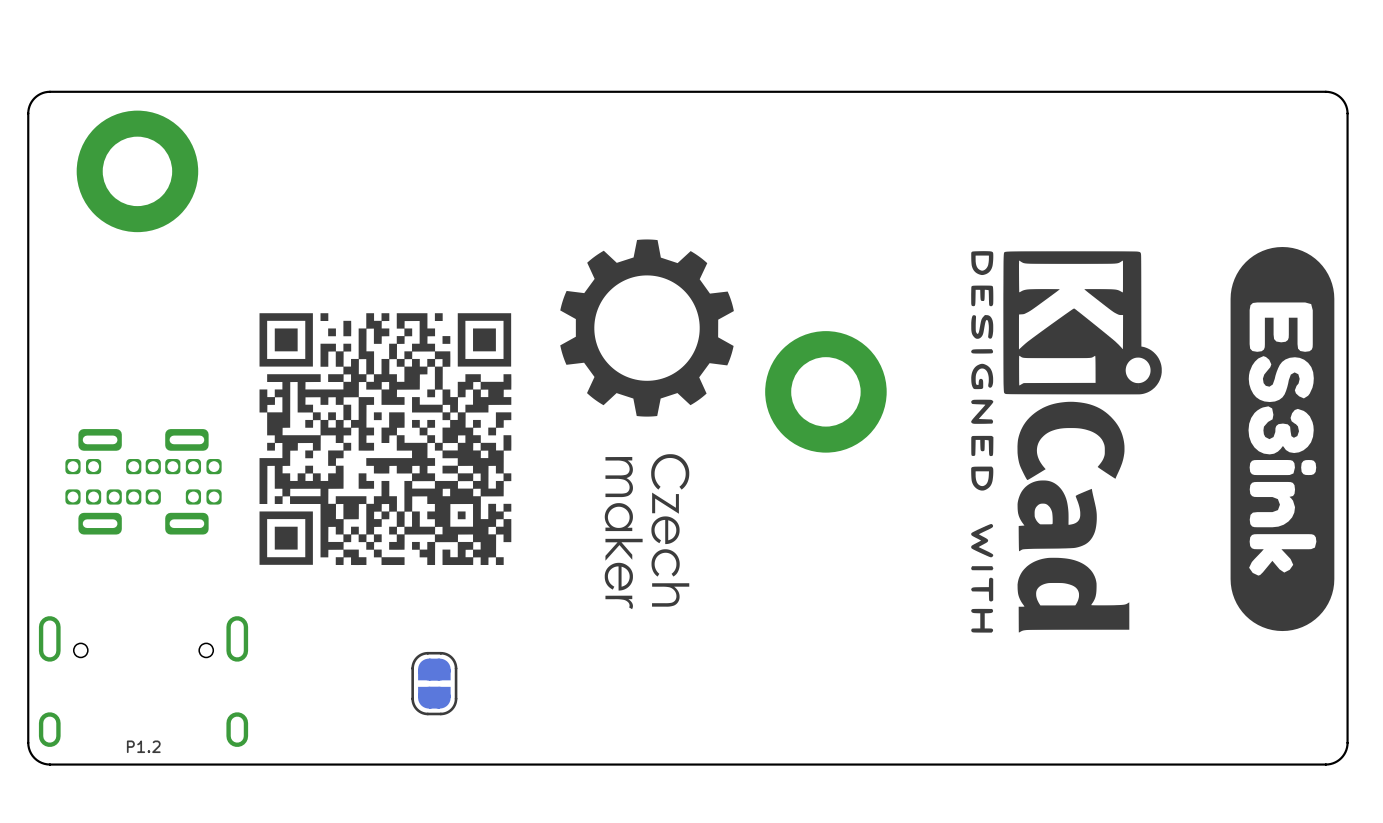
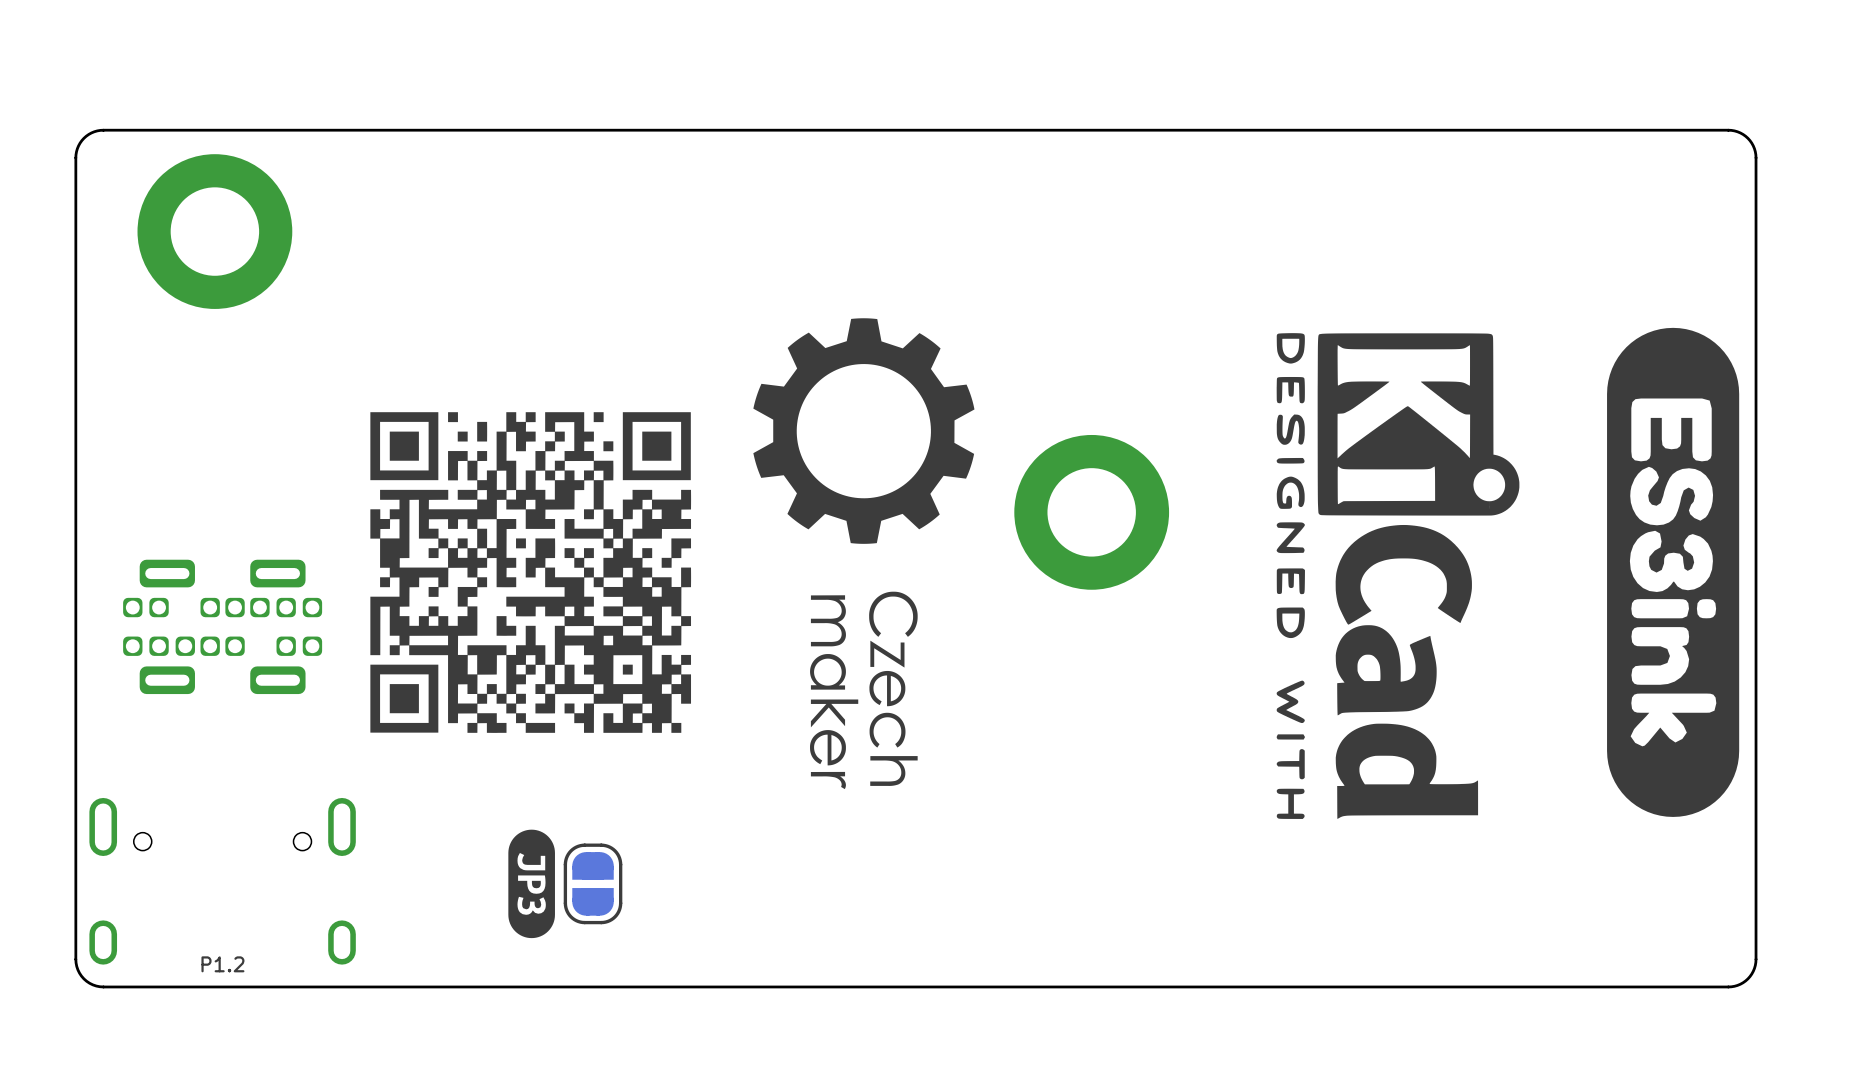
drawing: none -> [508, 829, 555, 939]

